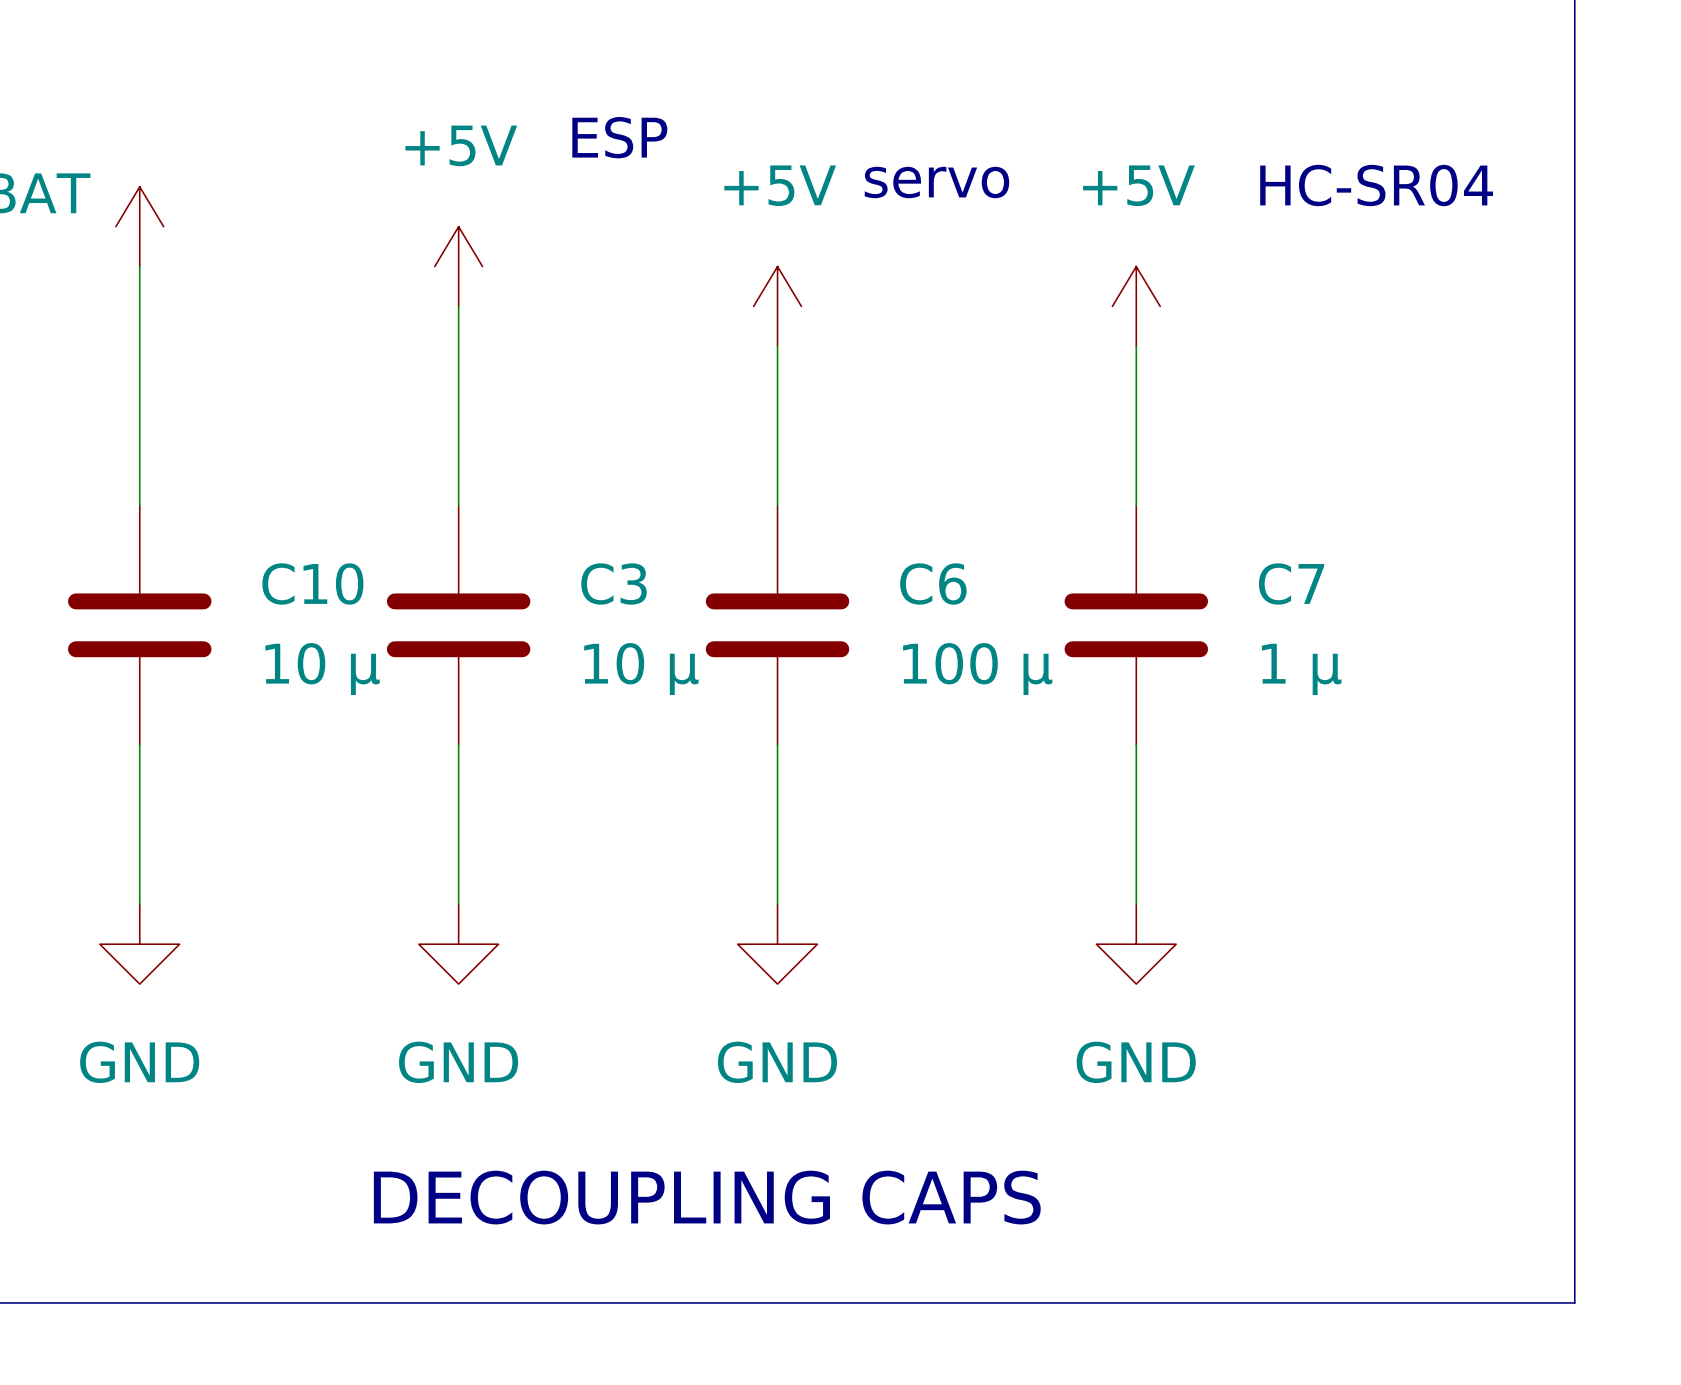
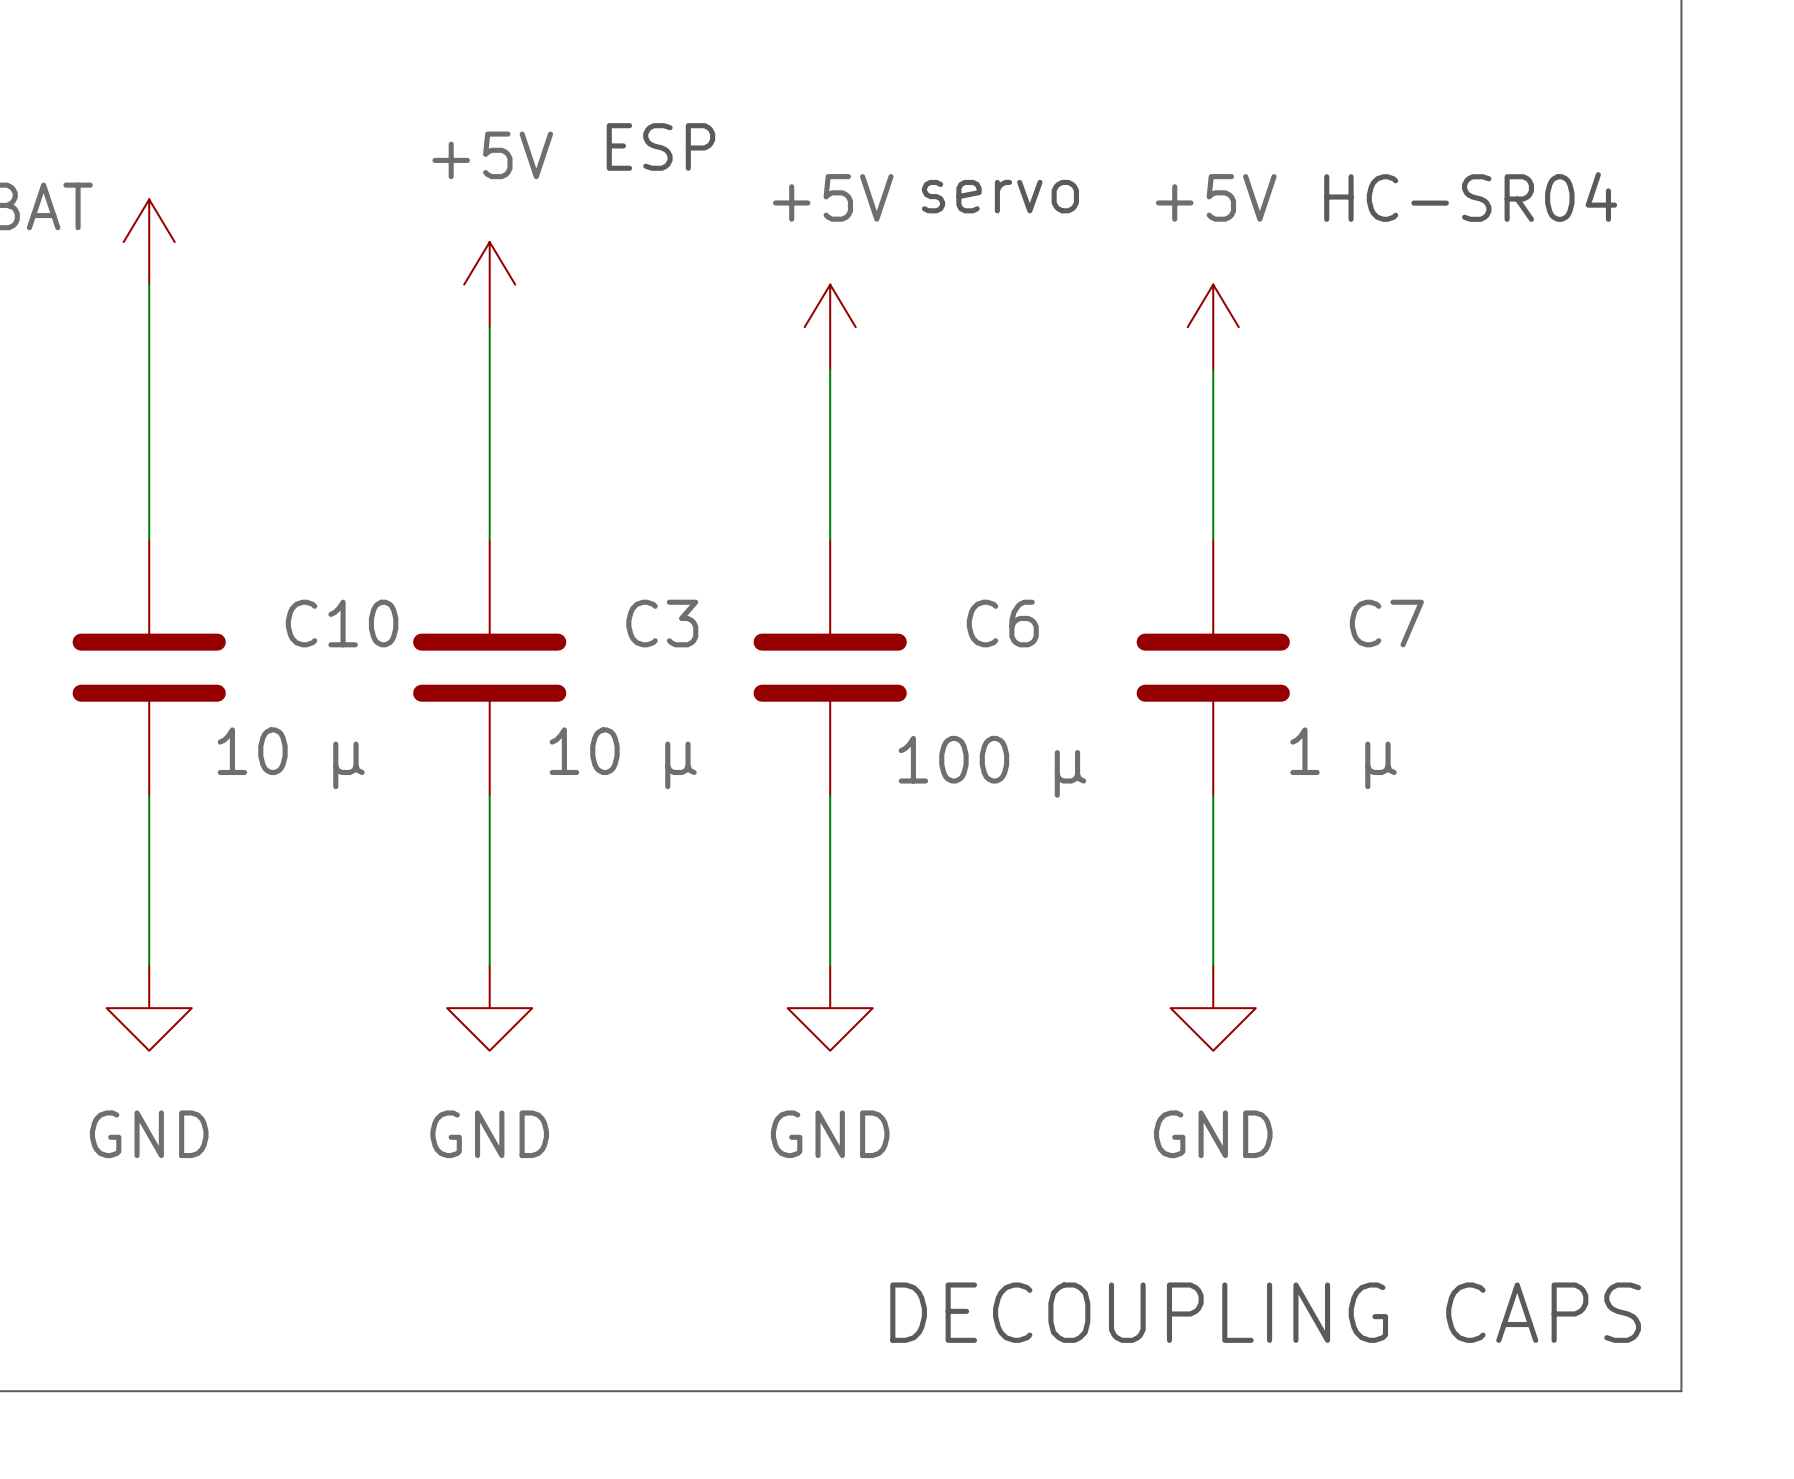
C10 value position: 10 μ (322, 669) -> 10 μ (291, 758)
C3 value position: 10 μ (641, 669) -> 10 μ (623, 758)
C6 value position: 100 μ (977, 669) -> 100 μ (992, 766)
C7 value position: 1 μ (1301, 669) -> 1 μ (1343, 758)
text position: DECOUPLING CAPS (707, 1197) -> DECOUPLING CAPS (1265, 1312)

